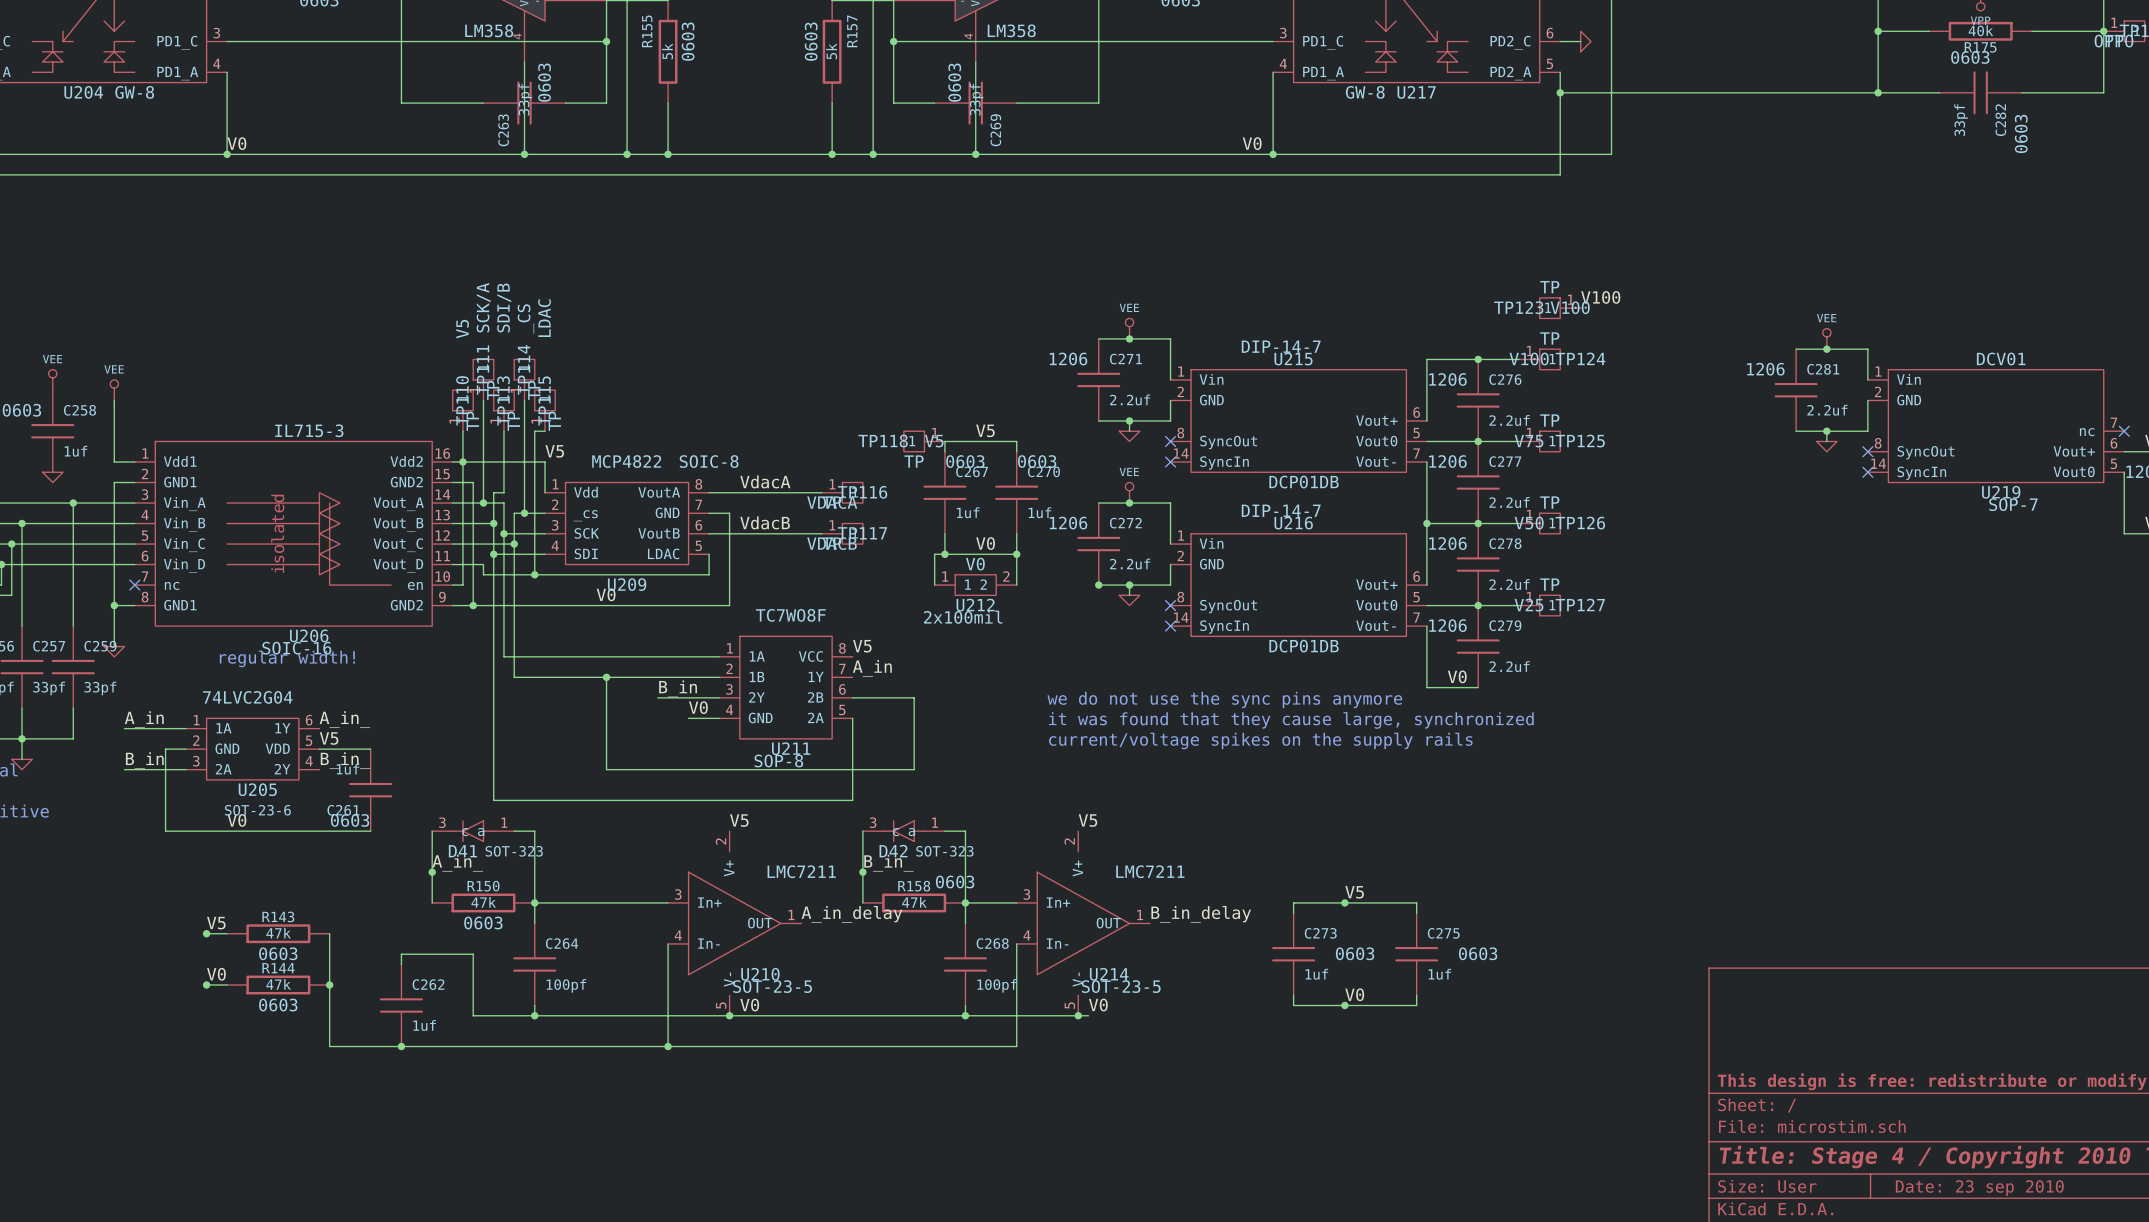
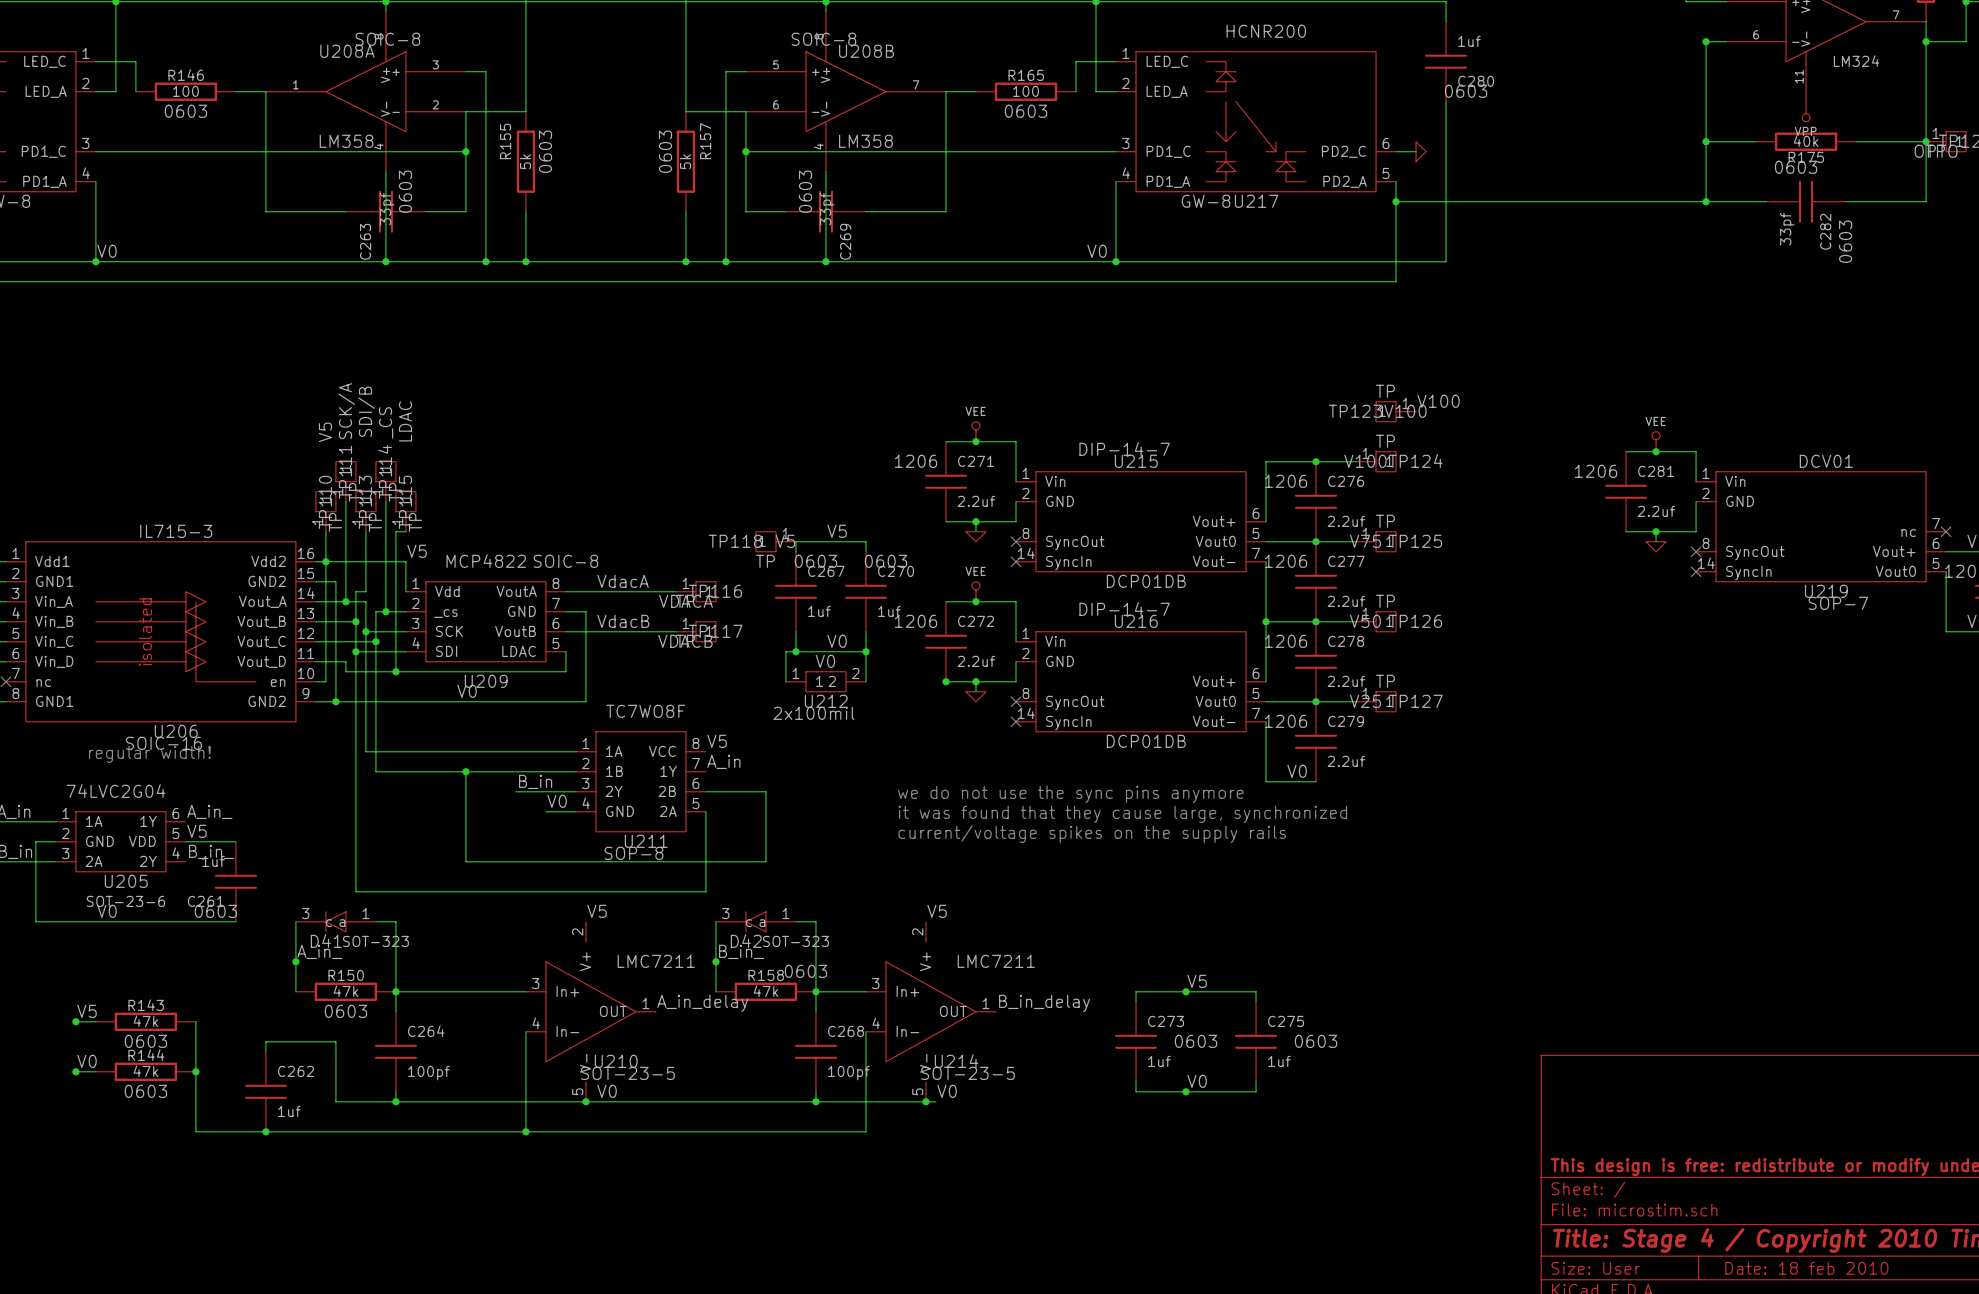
title block: Date: 23 sep 2010 (1979, 1188) -> Date: 18 feb 2010 (1806, 1268)

